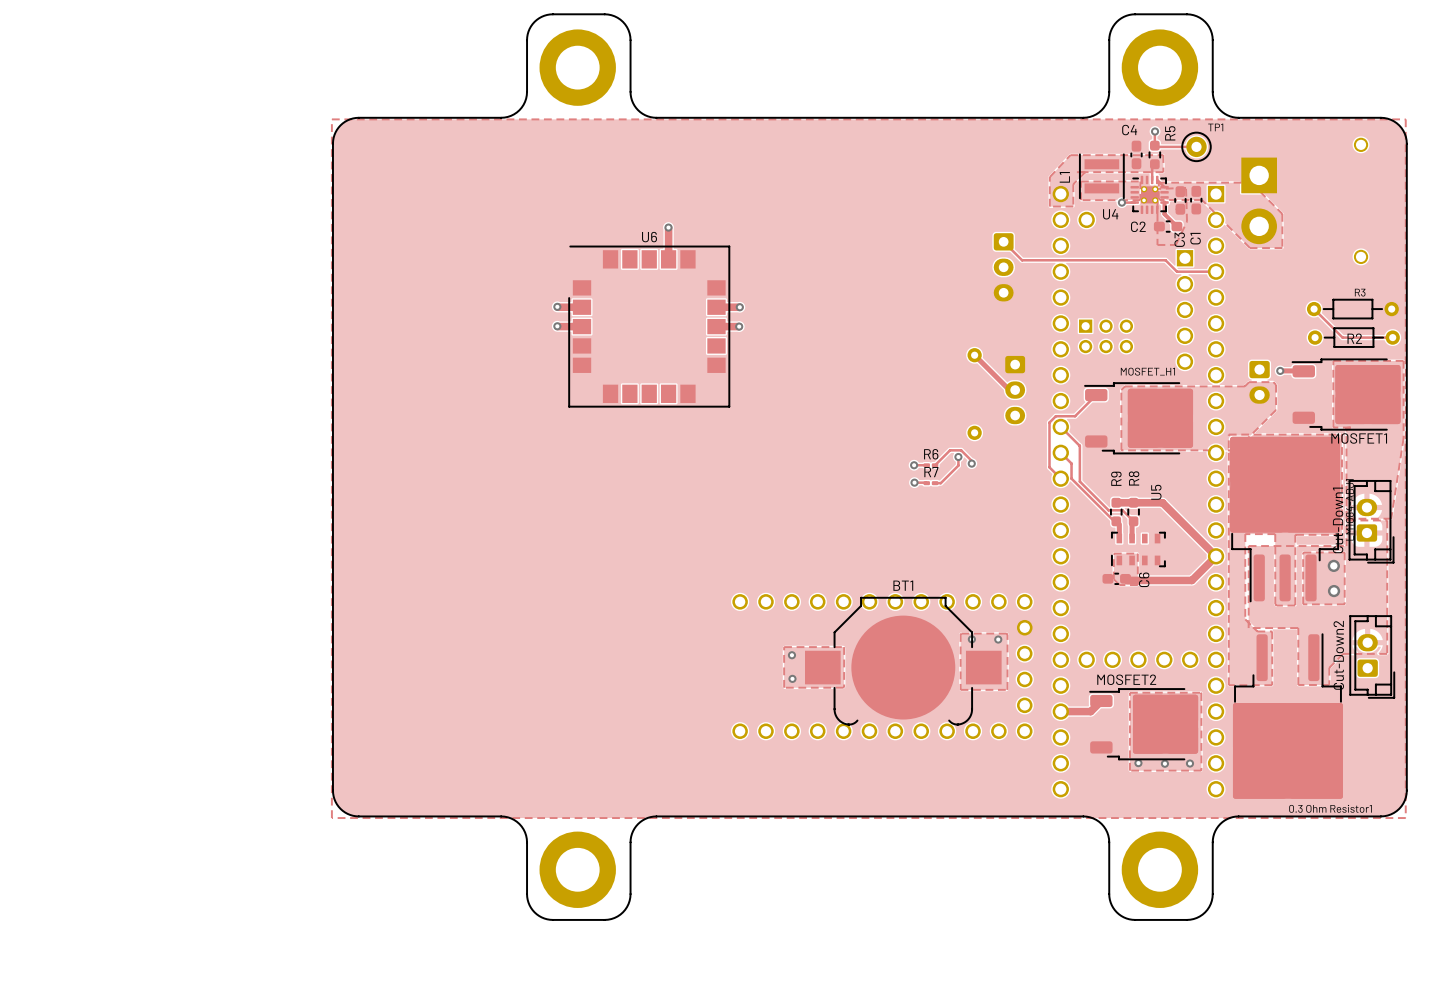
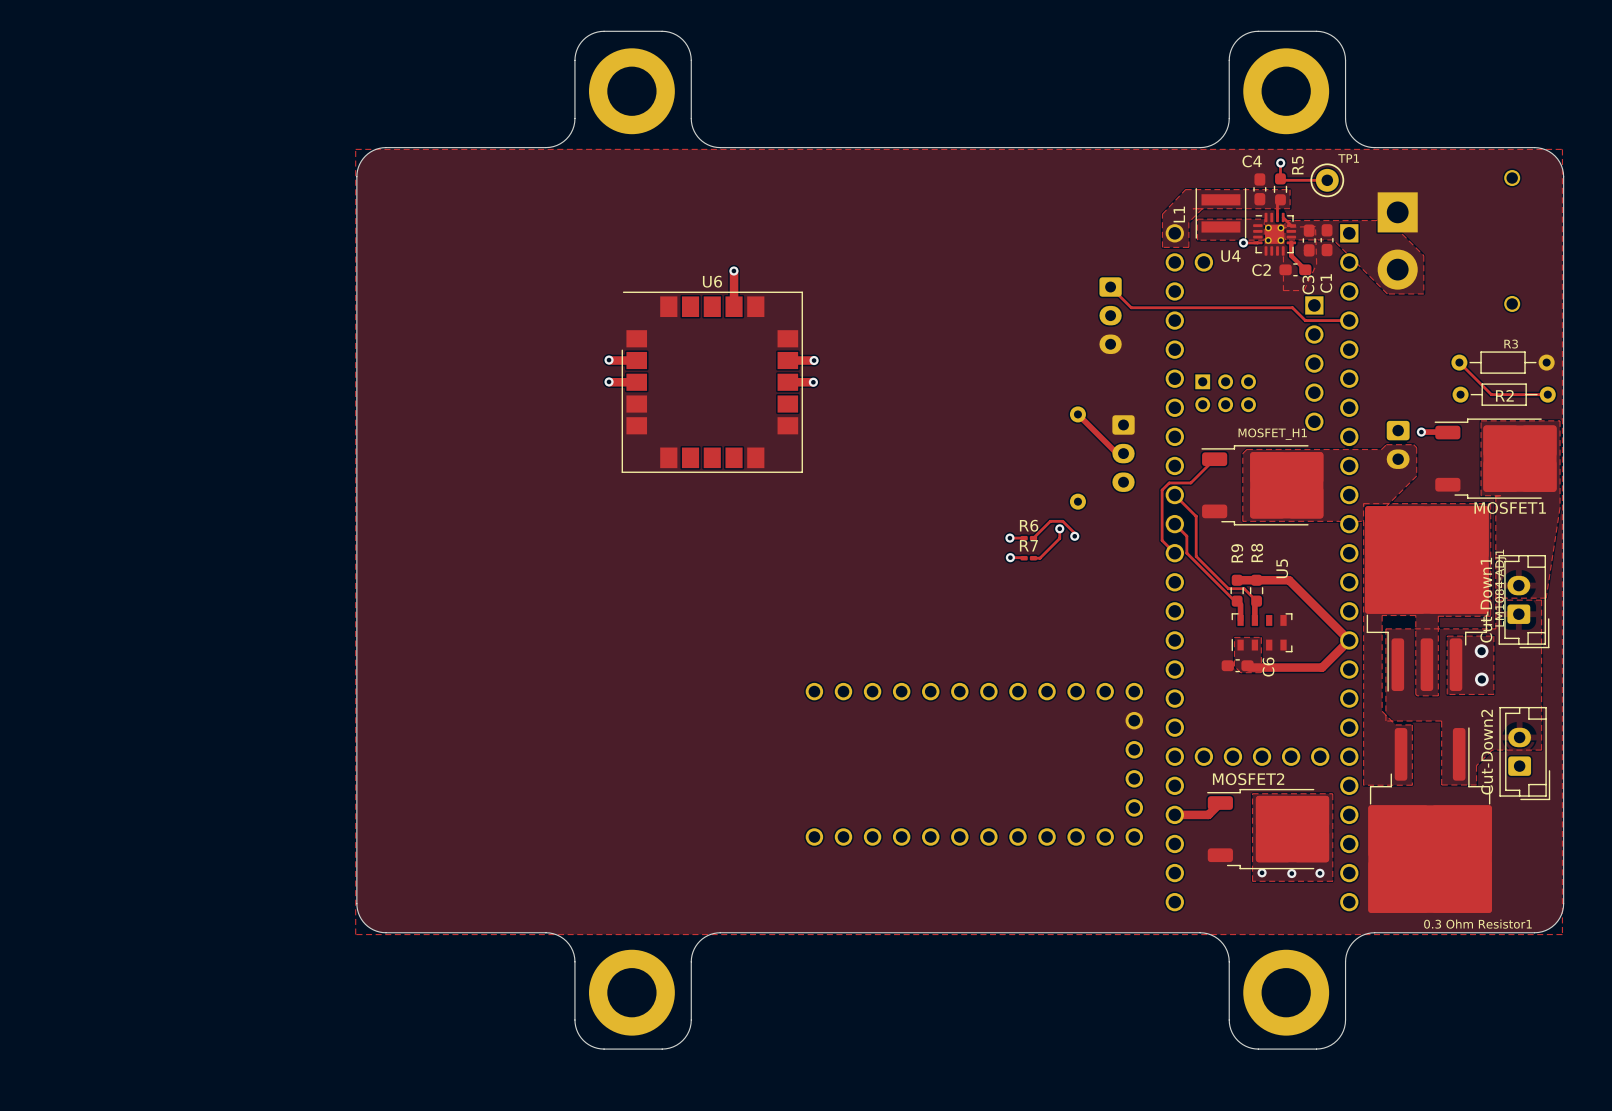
via: (971, 639) -> none
via: (998, 639) -> none
zone outline: (784, 647) (844, 647) (844, 687) (784, 687) (784, 647) -> none
via: (791, 655) -> none
BT1: (903, 661) -> none
via: (792, 678) -> none
zone outline: (1007, 689) (1007, 634) (961, 633) (960, 689) (1007, 689) -> none

